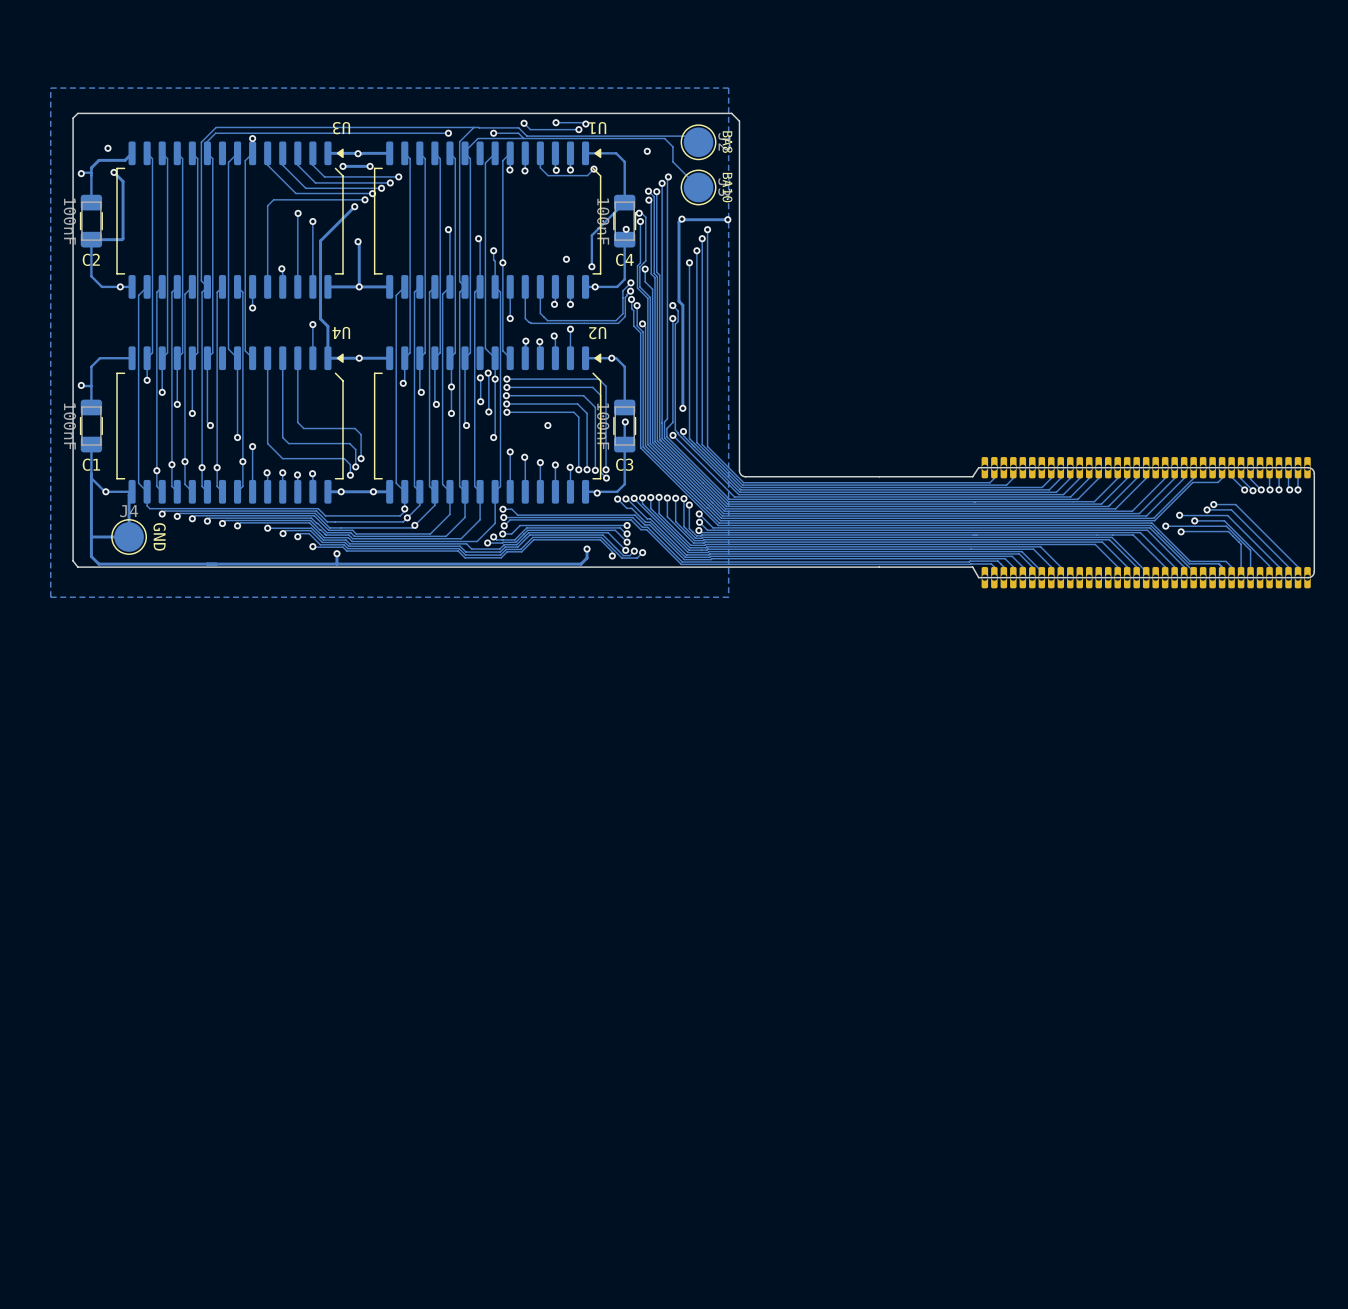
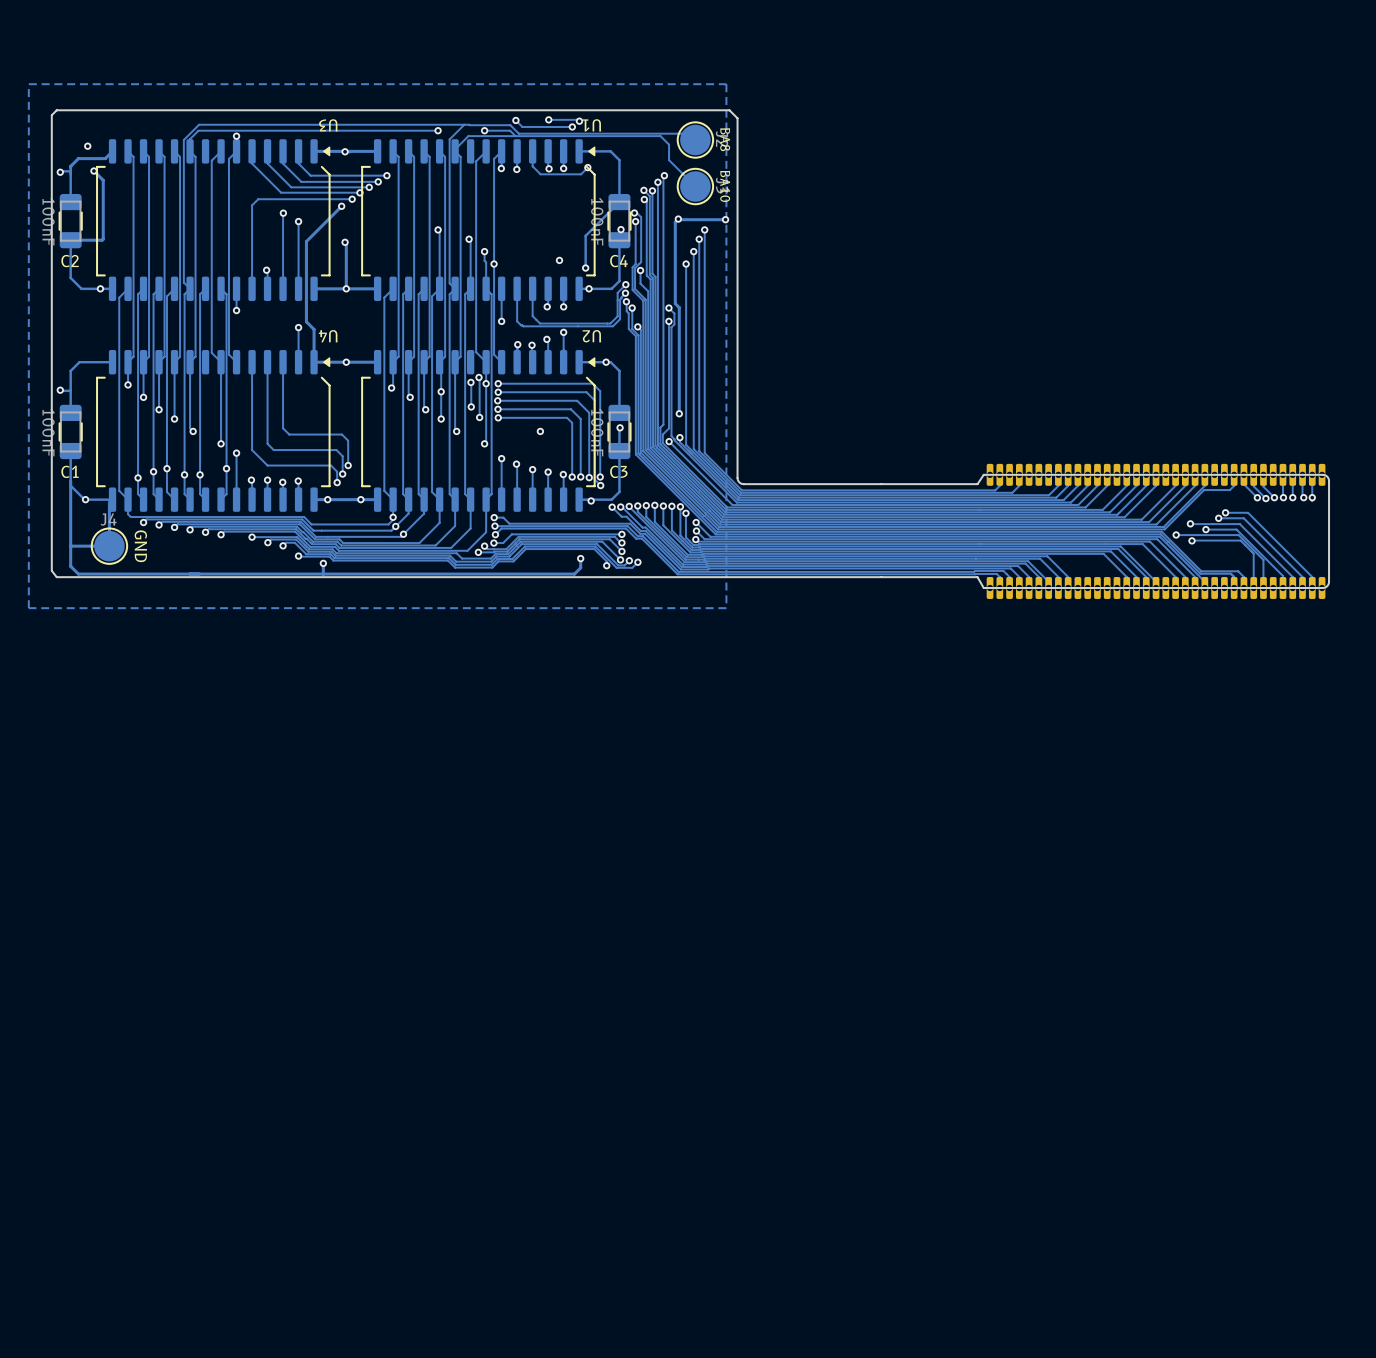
via: (647, 151) -> none
via: (343, 166) -> none
track: (370, 166) (343, 166) -> none
via: (370, 166) -> none

